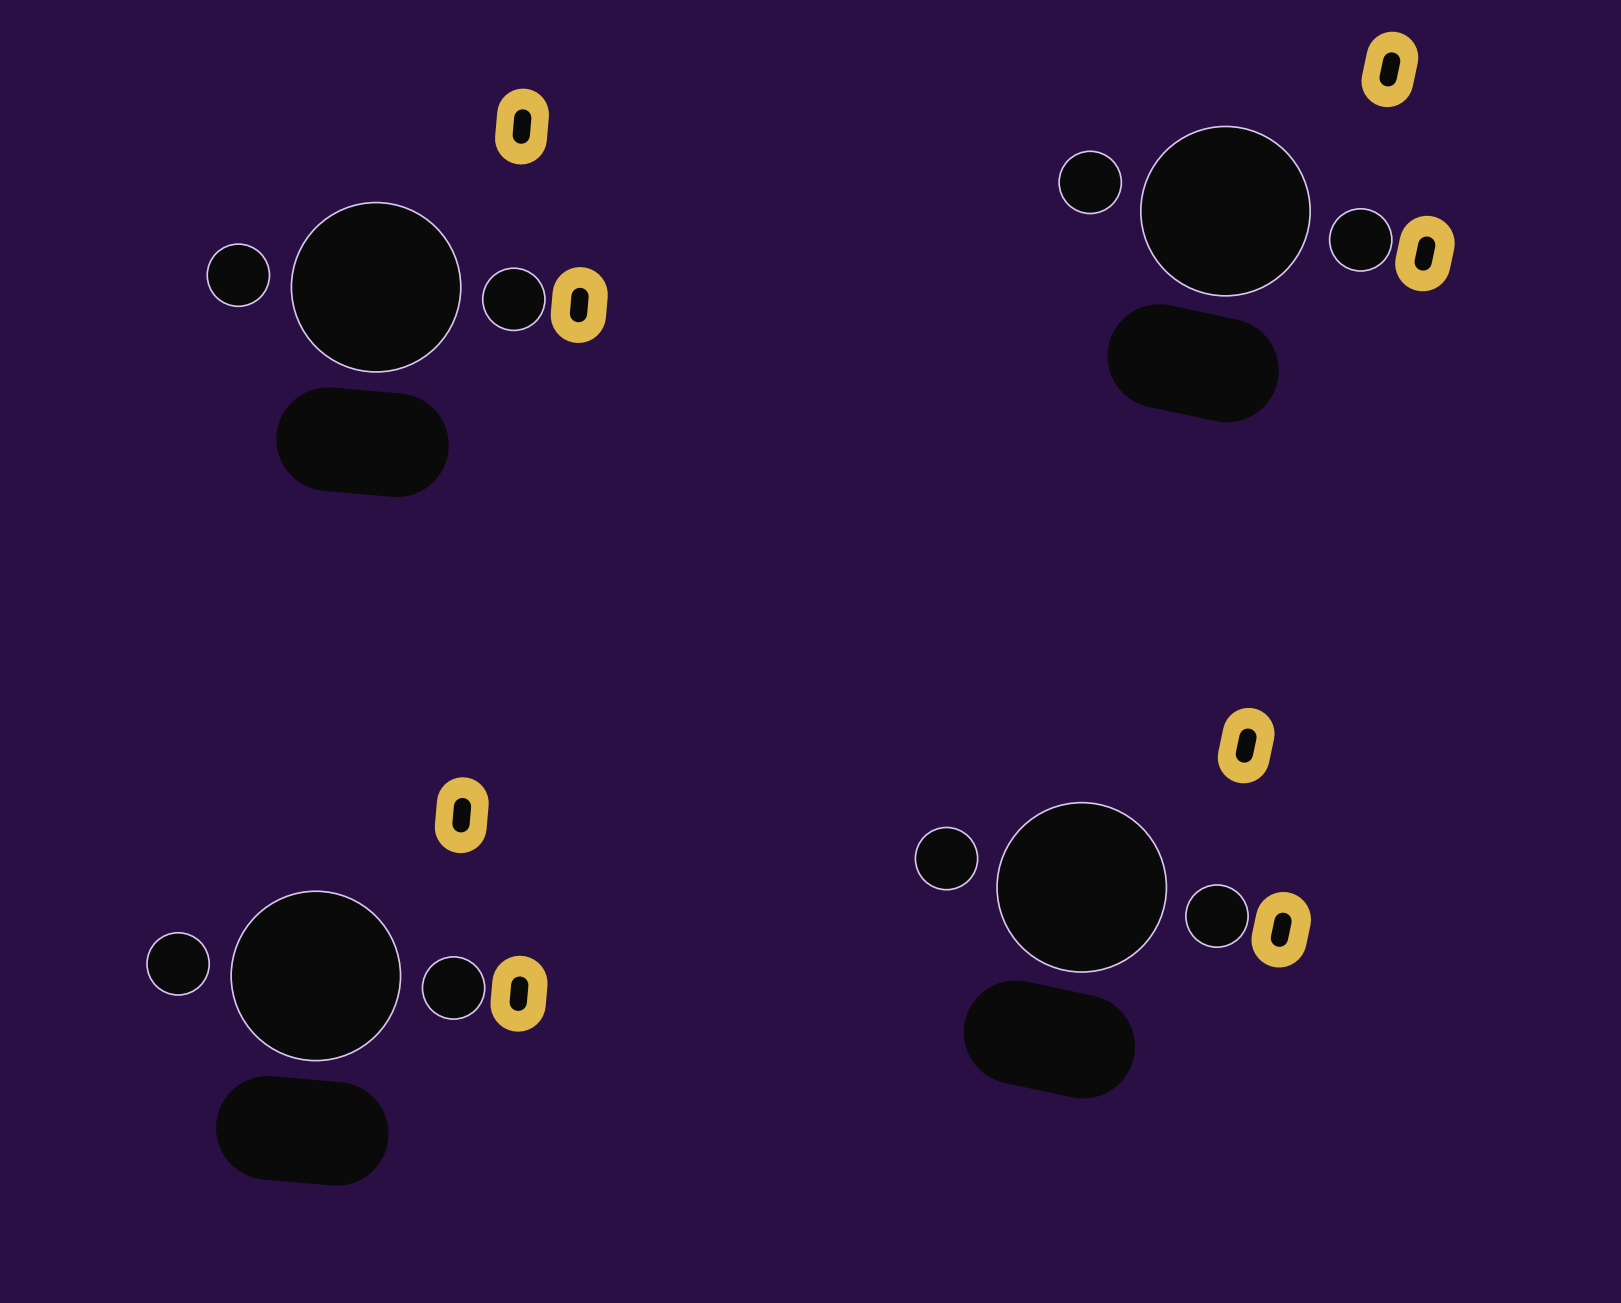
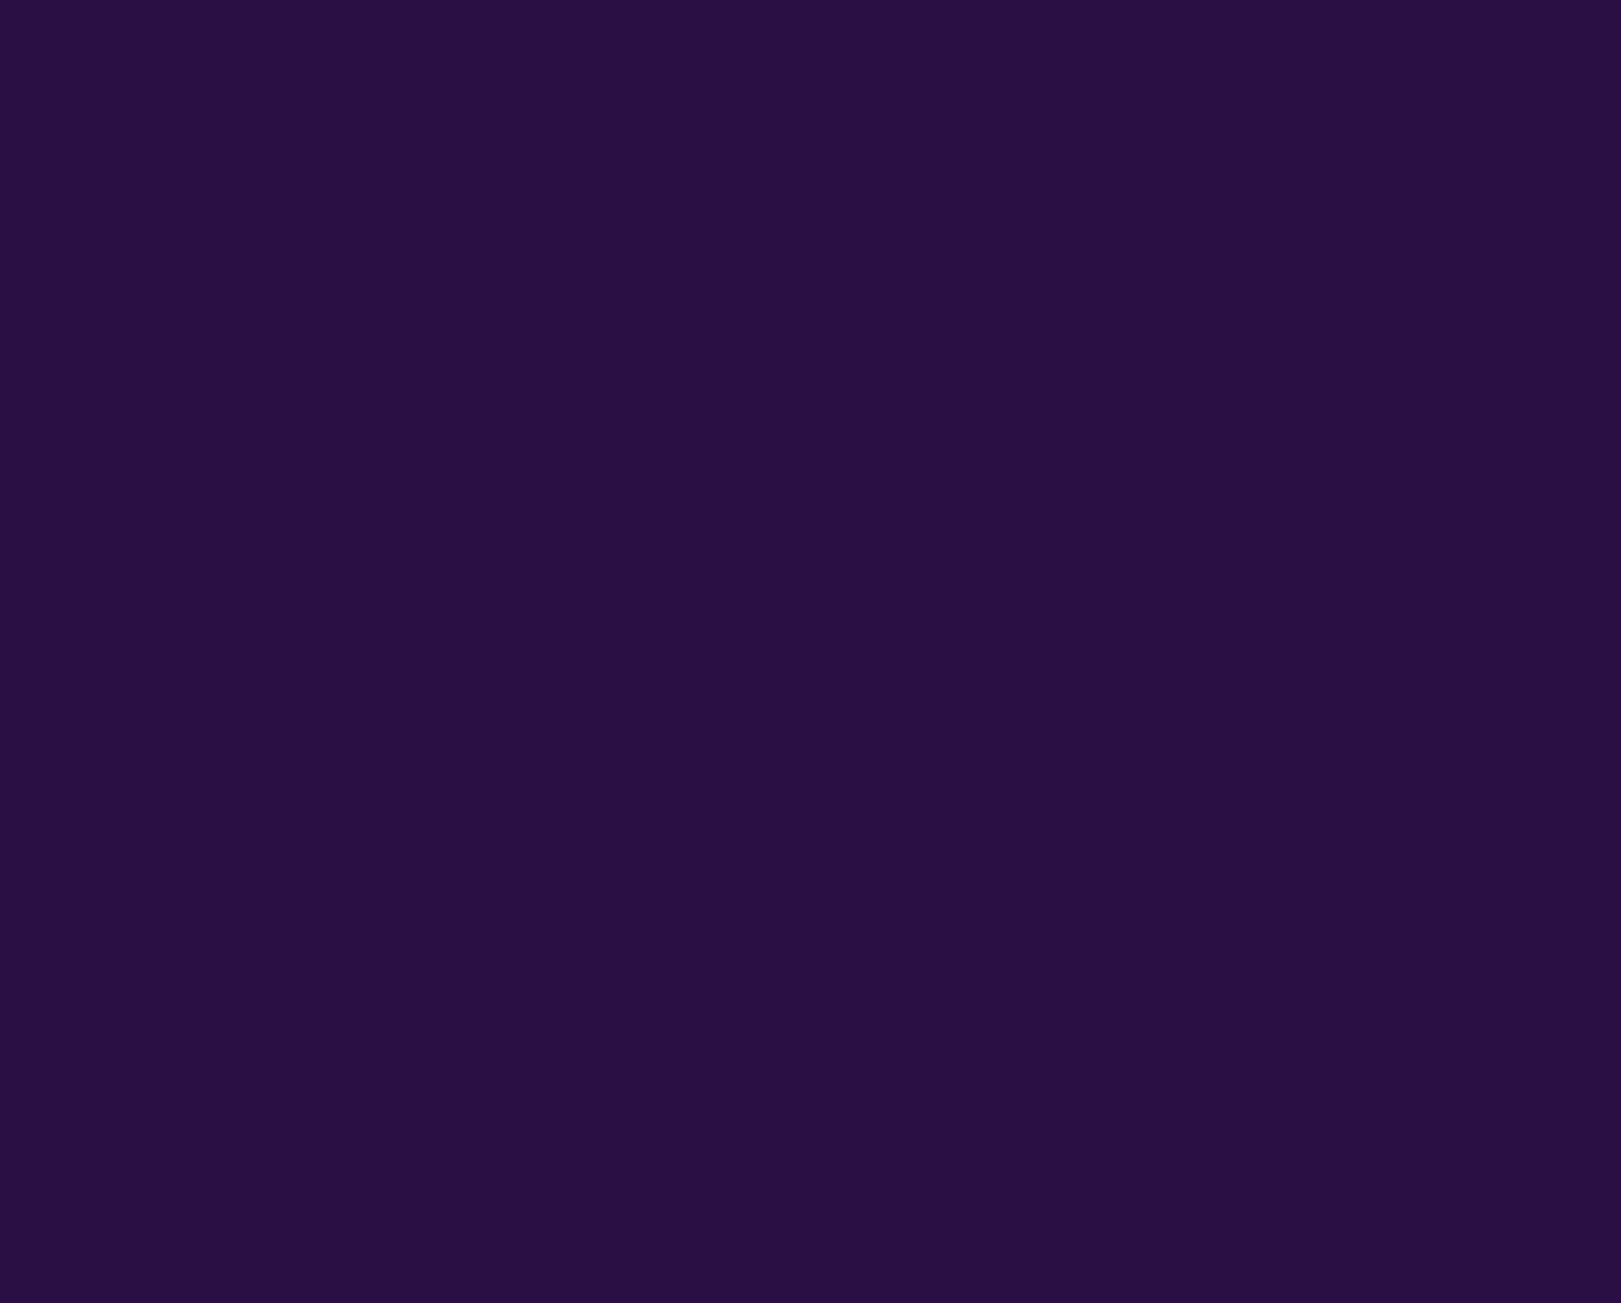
part: (1256, 226) -> none
part: (407, 292) -> none
part: (1113, 903) -> none
part: (347, 981) -> none

